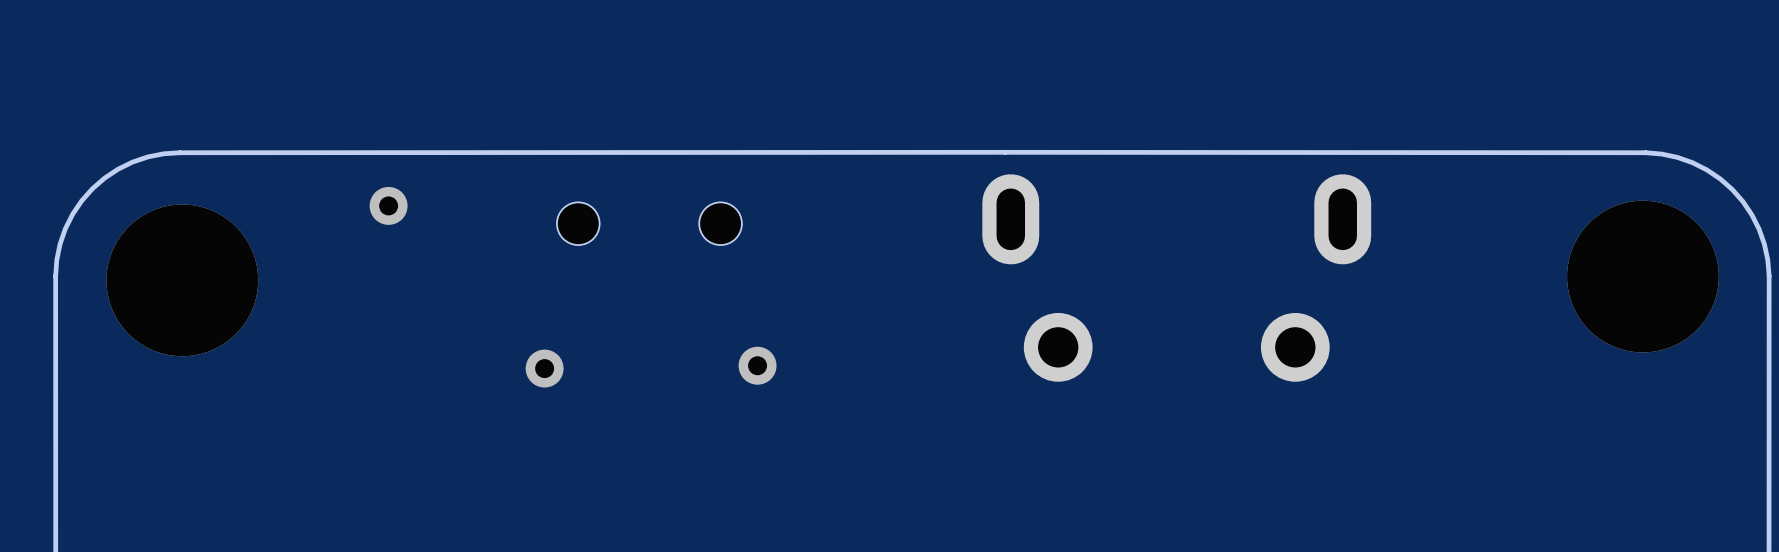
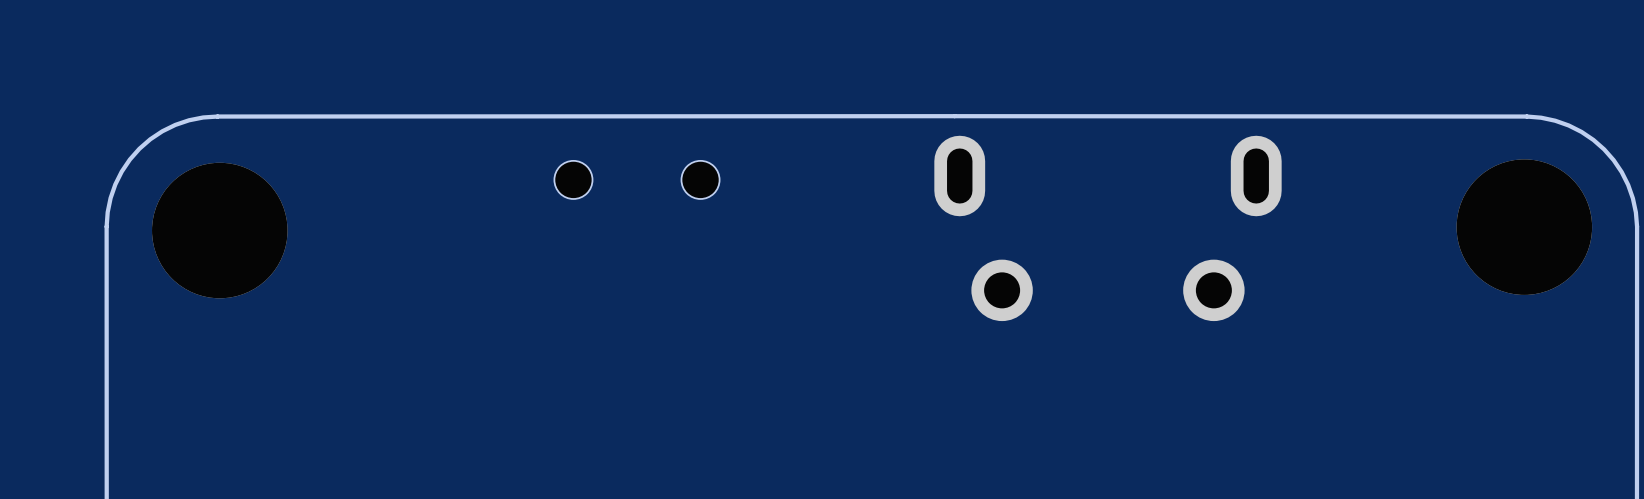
via: (388, 205) -> none
via: (757, 365) -> none
via: (544, 368) -> none

